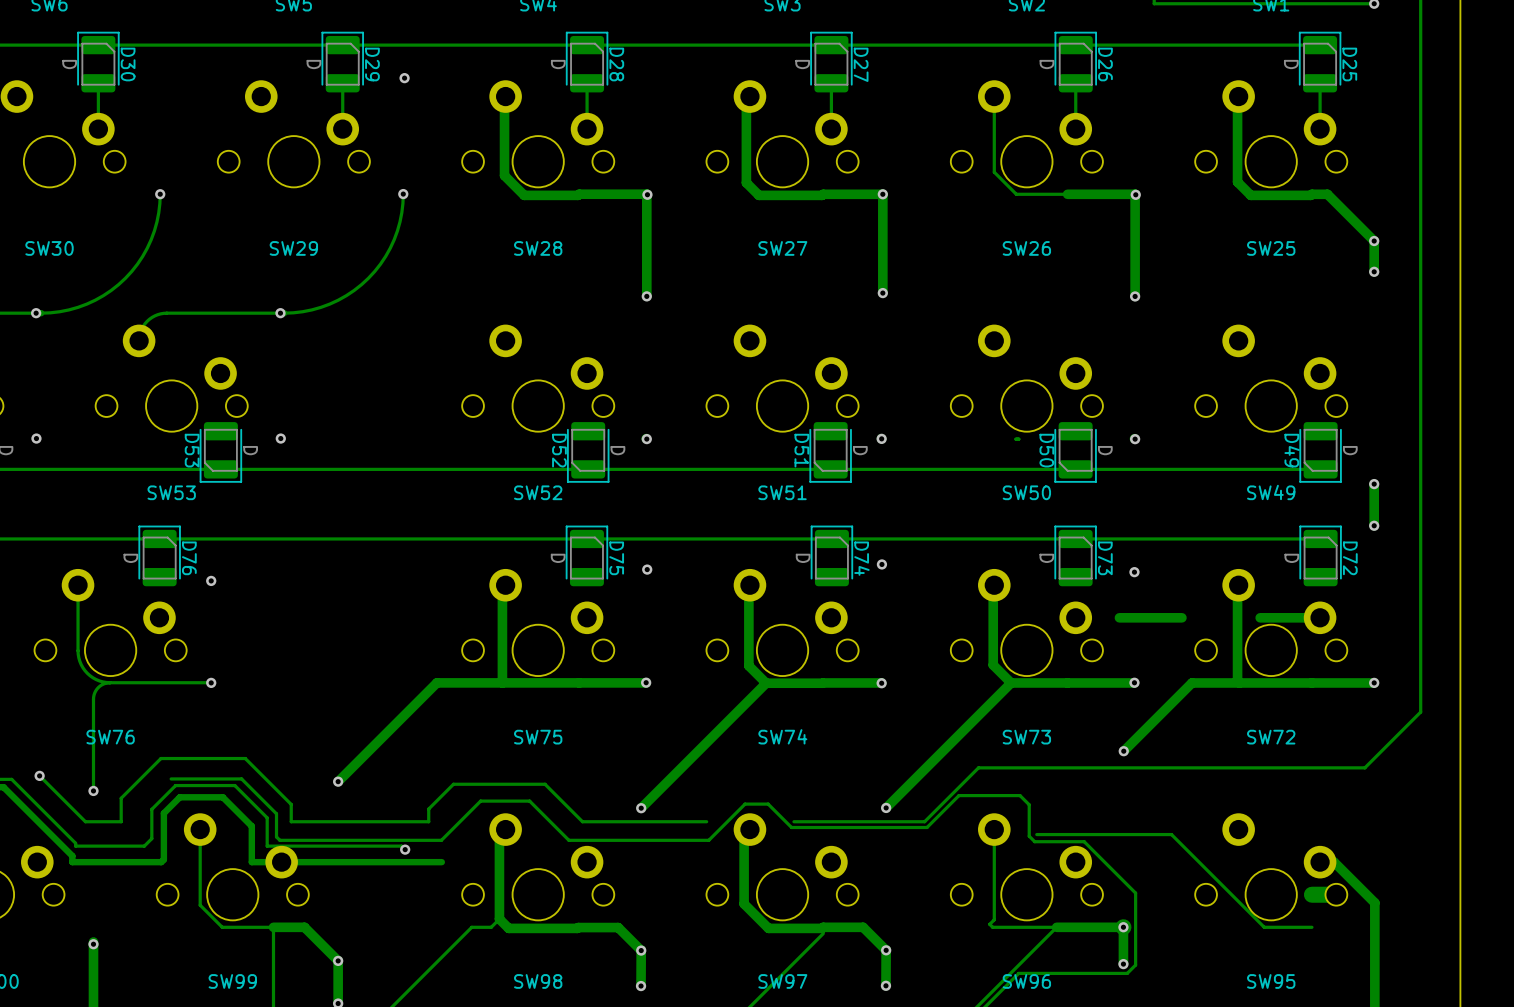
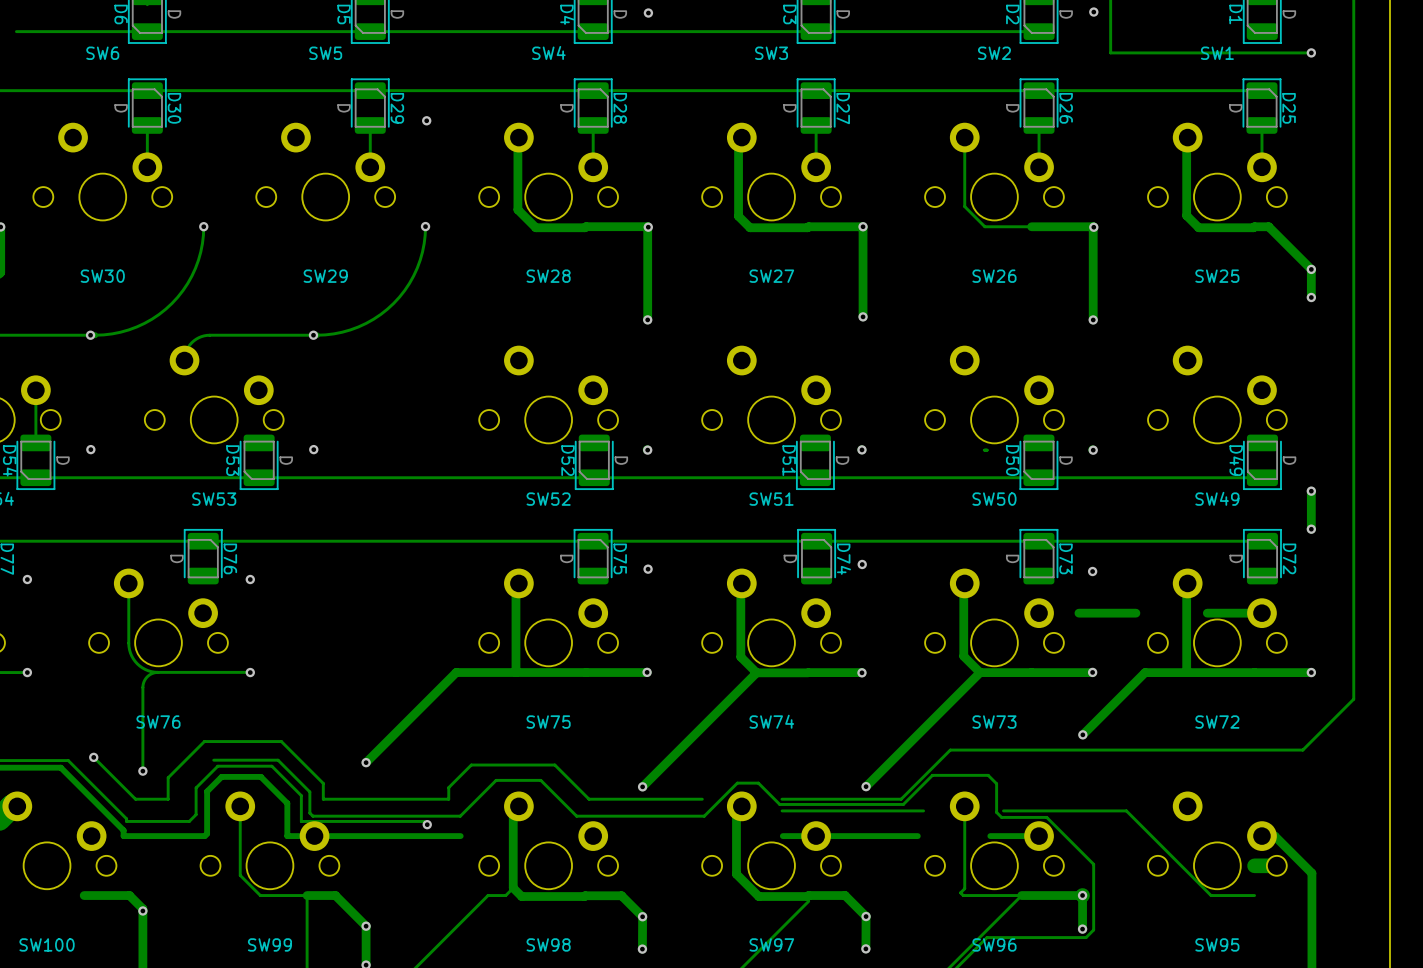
track: none -> (923, 810) (782, 810)
track: none -> (917, 836) (782, 836)
track: none -> (1031, 836) (990, 836)
track: none -> (84, 895) (129, 895) (142, 908)

